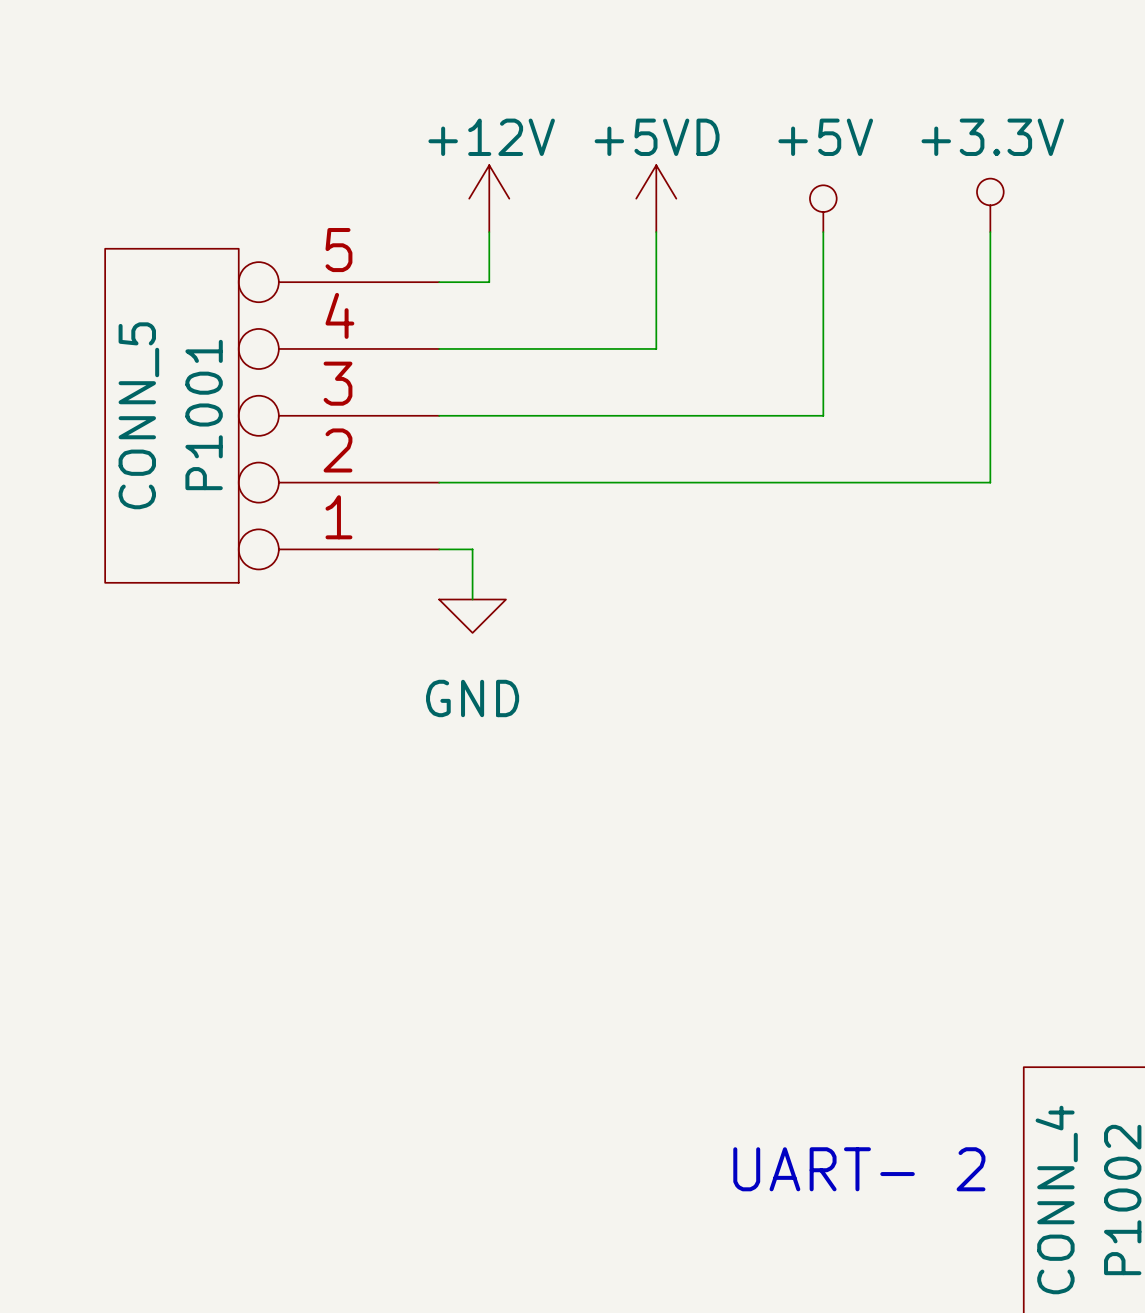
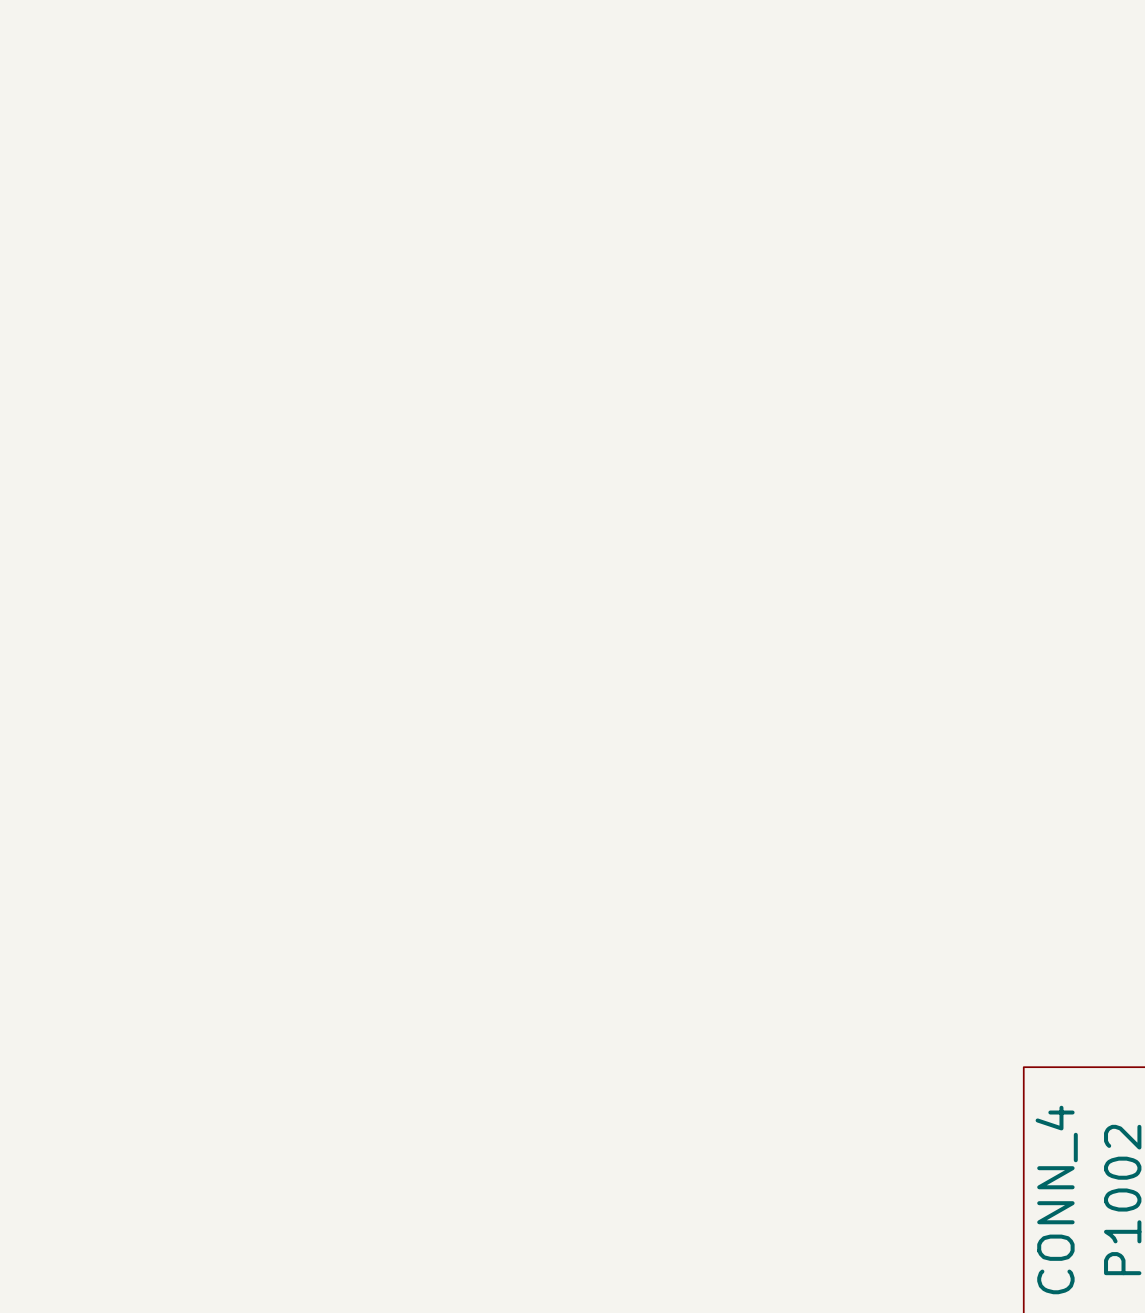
power symbol: +12V (489, 198) -> none
power symbol: +5VD (656, 198) -> none
power symbol: +3.3V (990, 205) -> none
power symbol: +5V (823, 208) -> none
wire: (489, 232) (489, 282) (439, 282) -> none
wire: (656, 232) (656, 348) (439, 348) -> none
wire: (823, 232) (823, 415) (439, 415) -> none
wire: (990, 232) (990, 482) (439, 482) -> none
P1001: CONN_5 (272, 415) -> none
wire: (439, 549) (472, 549) (472, 599) -> none
power symbol: GND (472, 616) -> none
text: UART- 2 (859, 1169) -> none

